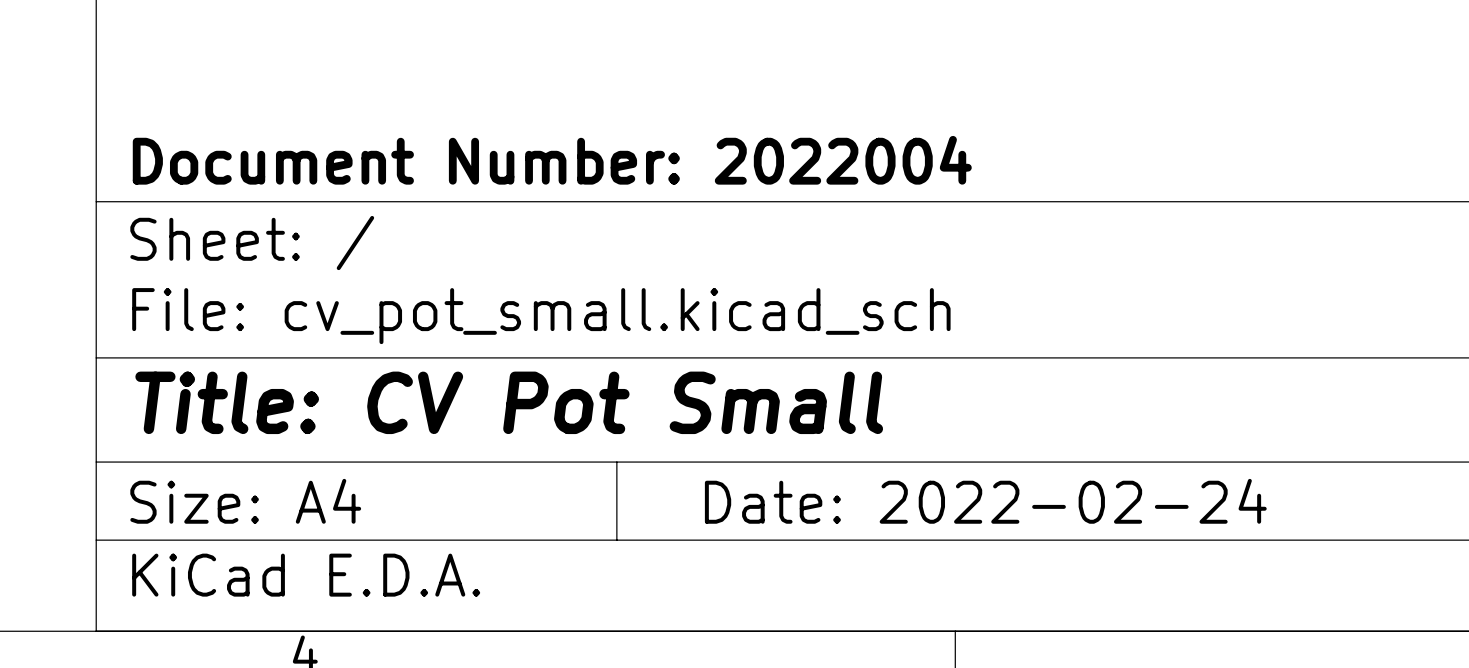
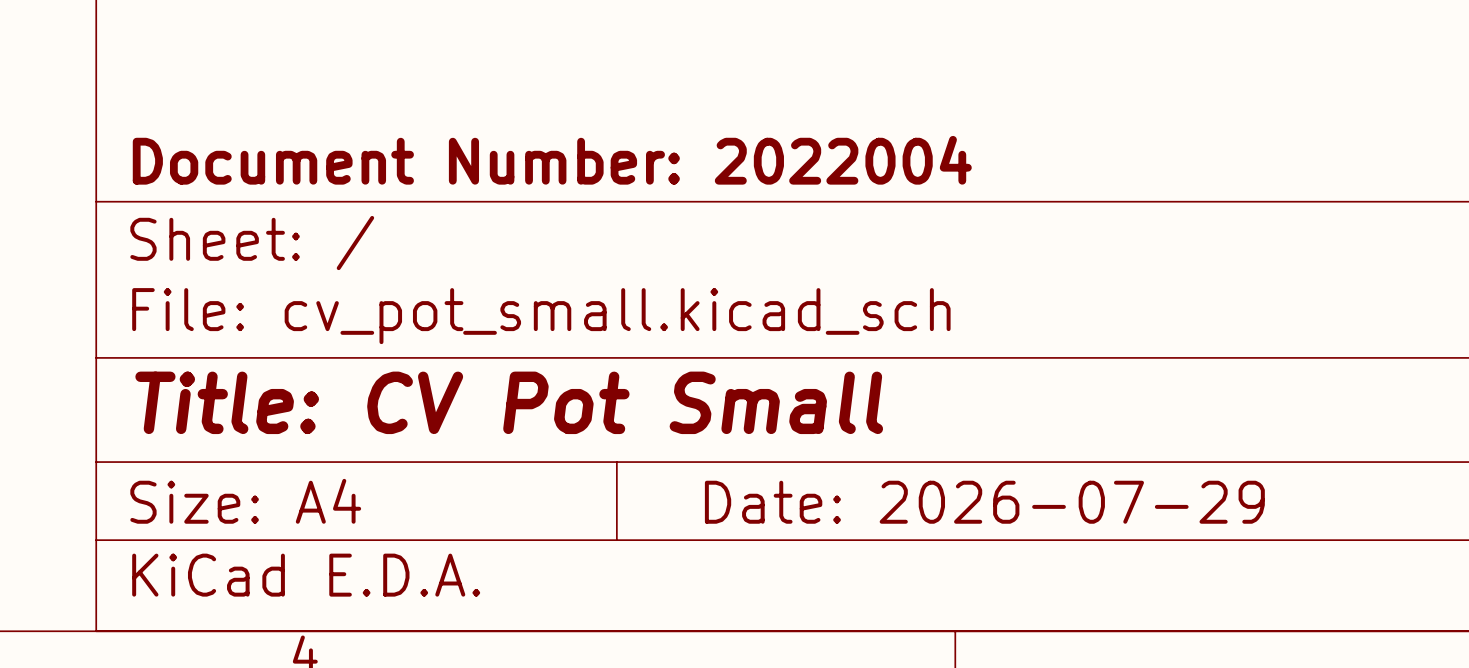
title block: Date: 2022-02-24 (985, 501) -> Date: 2026-07-29 (984, 502)

